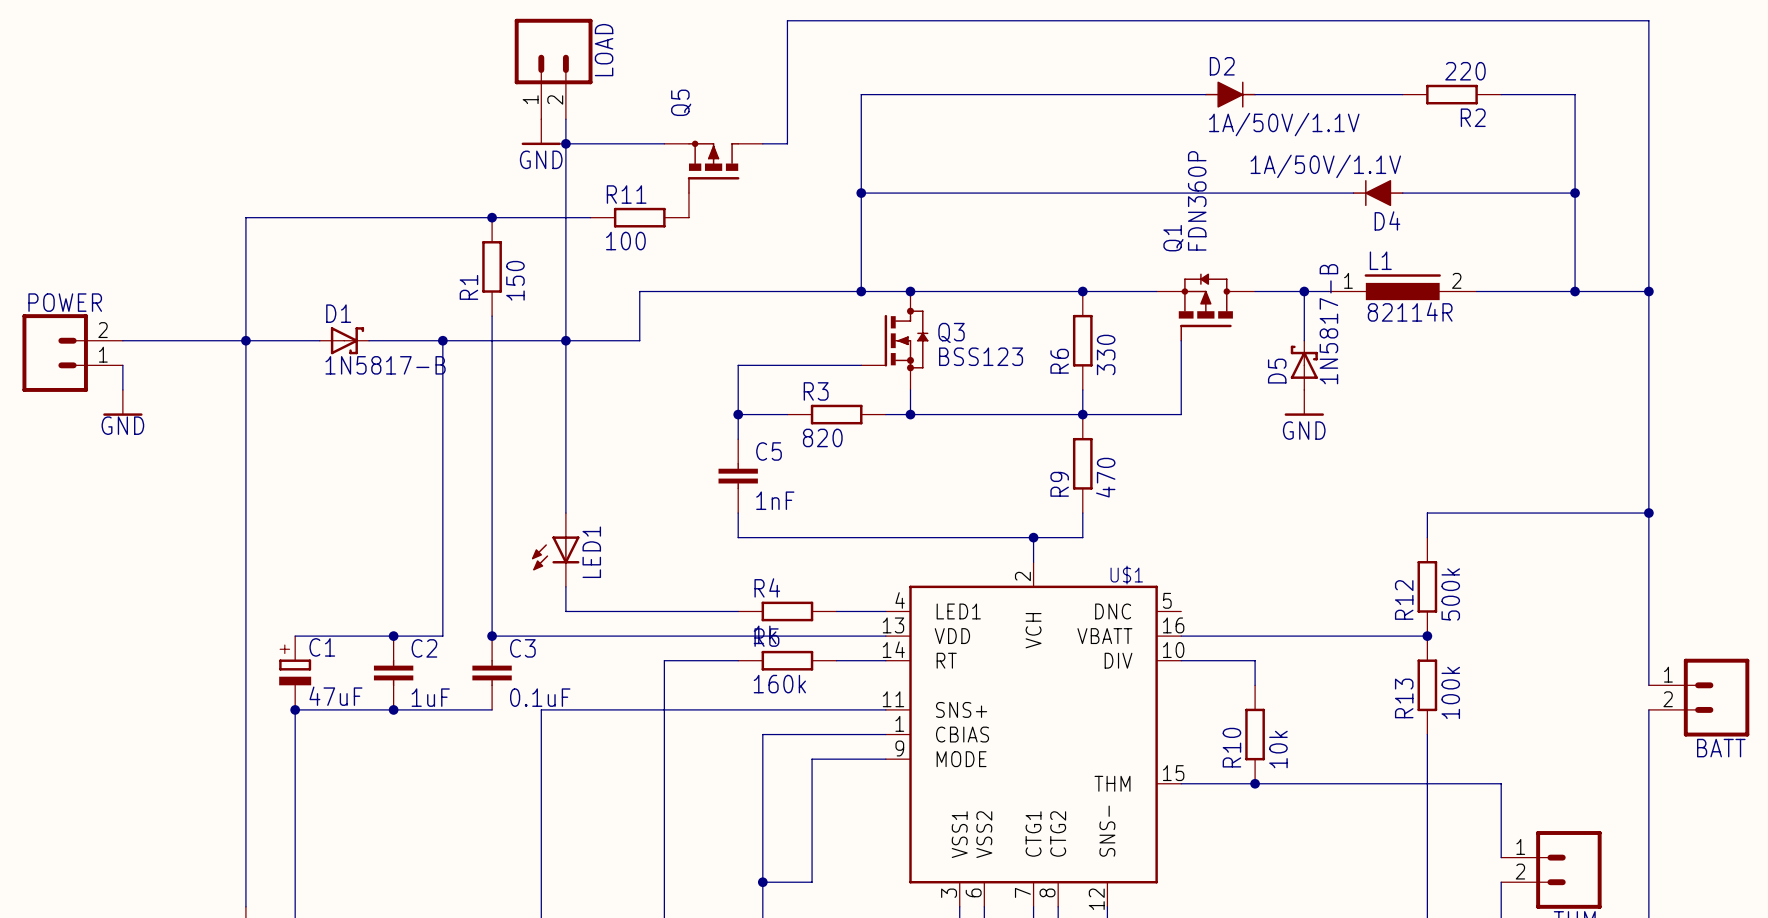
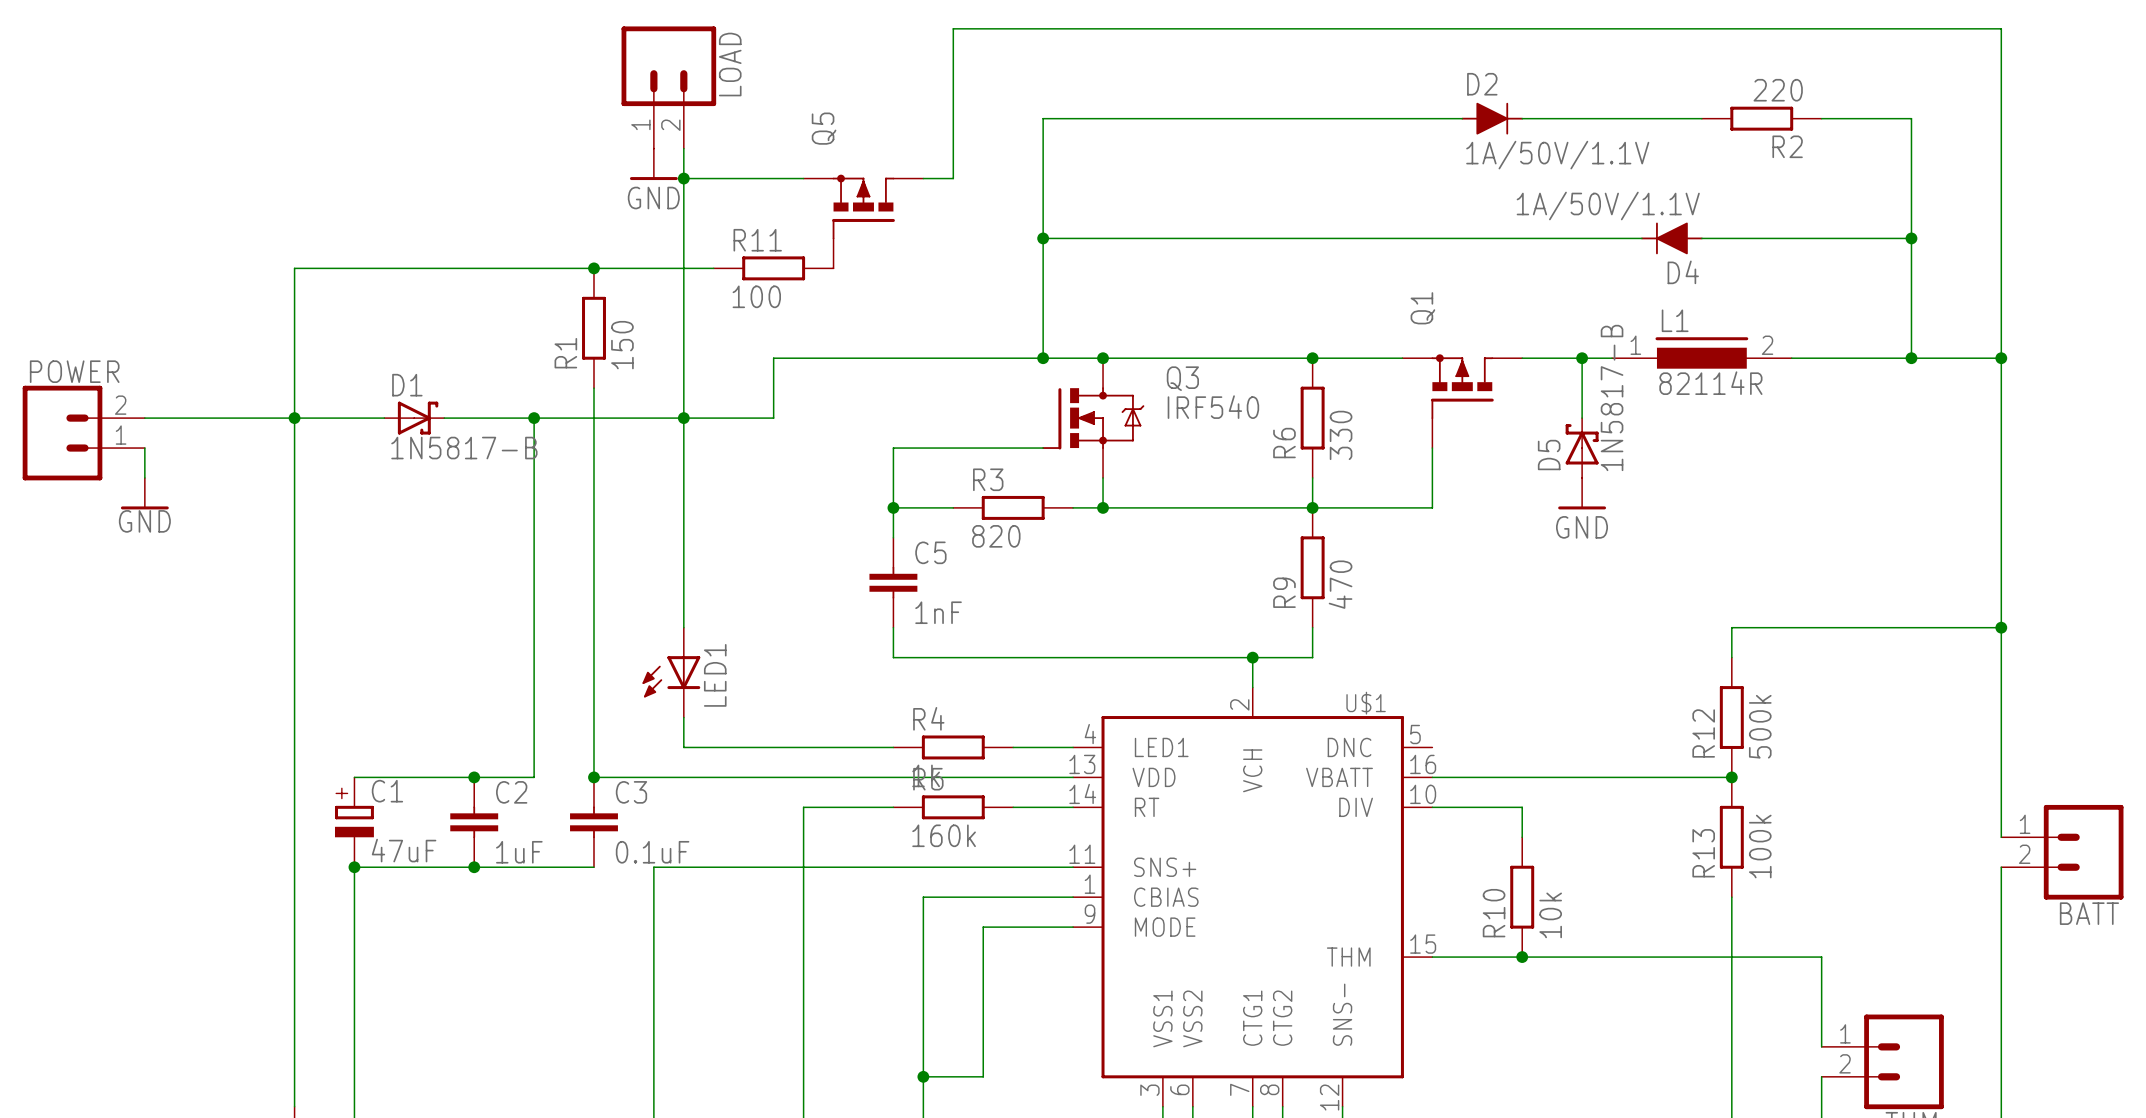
Q1 value: FDN360P (1197, 200) -> none
Q1 symbol: [1156, 273, 1256, 342] -> [1402, 354, 1523, 449]
Q3 symbol: [861, 291, 929, 390] -> [1042, 358, 1145, 478]
Q3 name position: Q3 (951, 332) -> Q3 (1182, 378)
Q3 value: BSS123 (981, 356) -> IRF540 (1213, 407)

